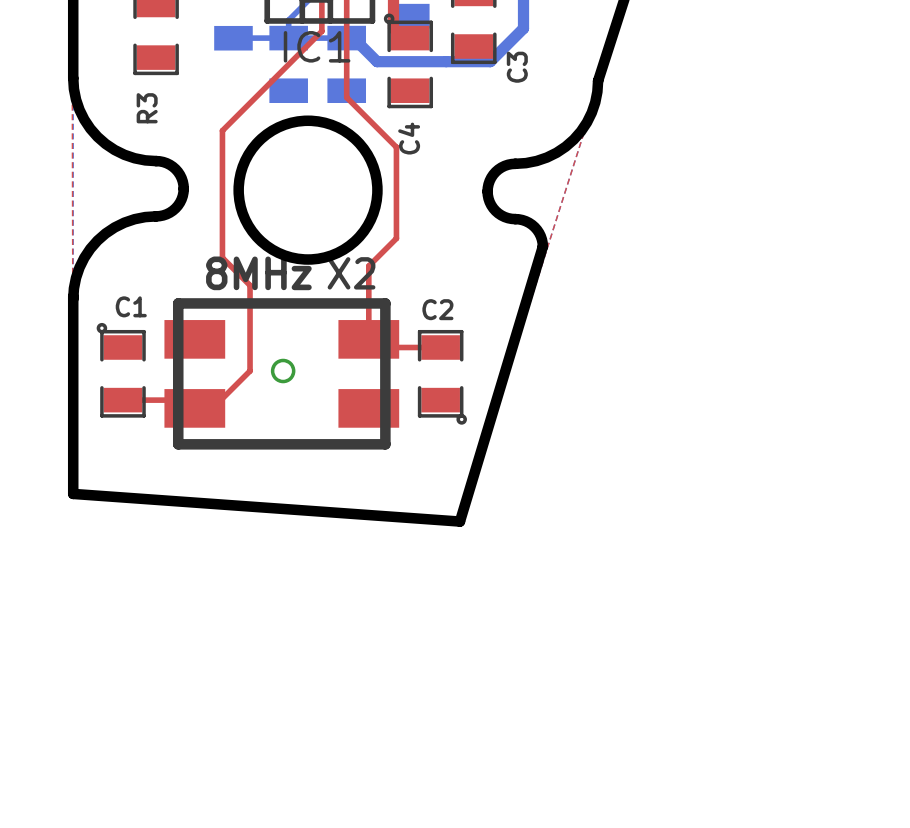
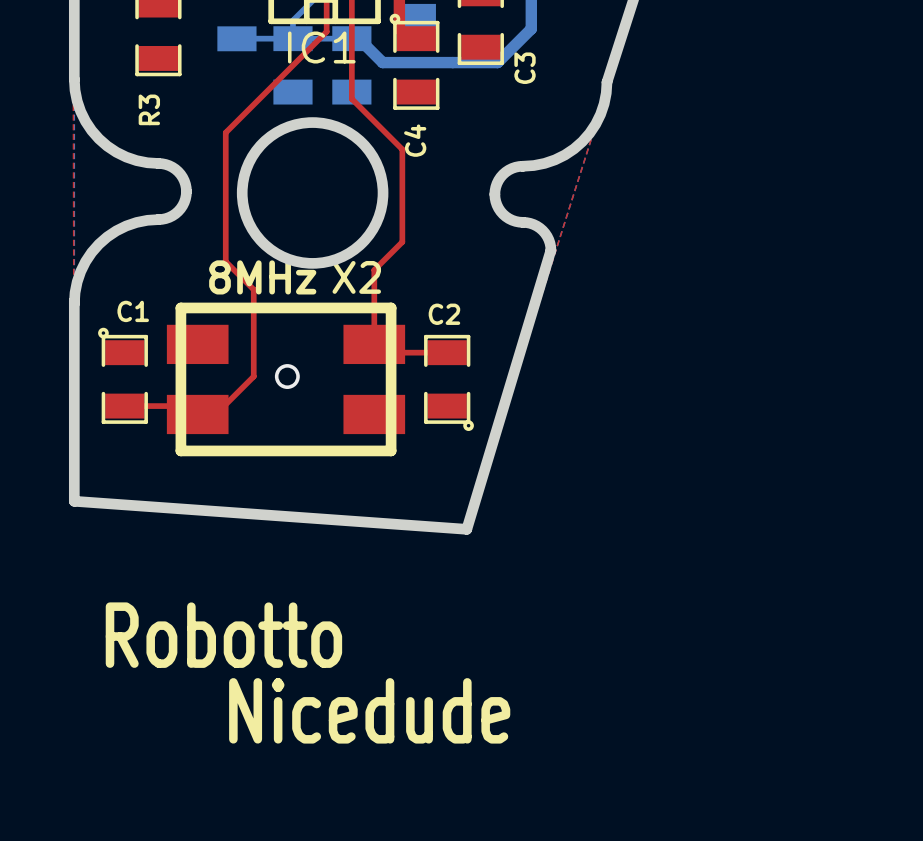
text: none -> Robotto (223, 635)
text: none -> Nicedude (369, 710)

